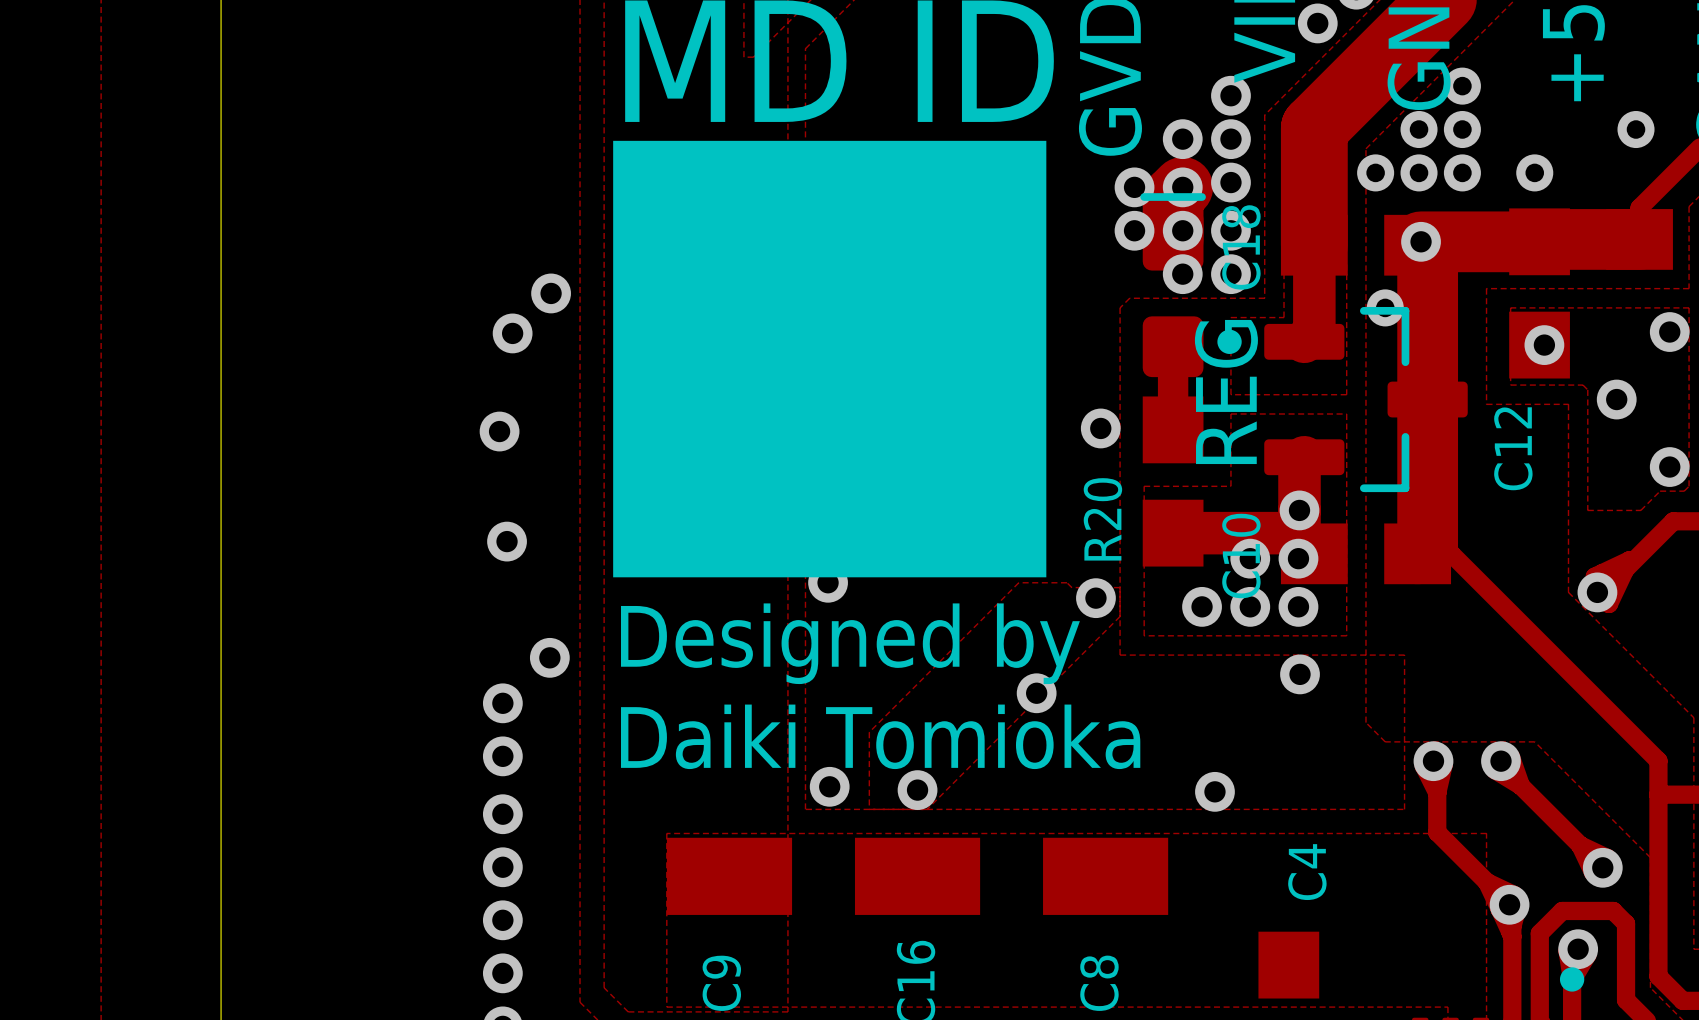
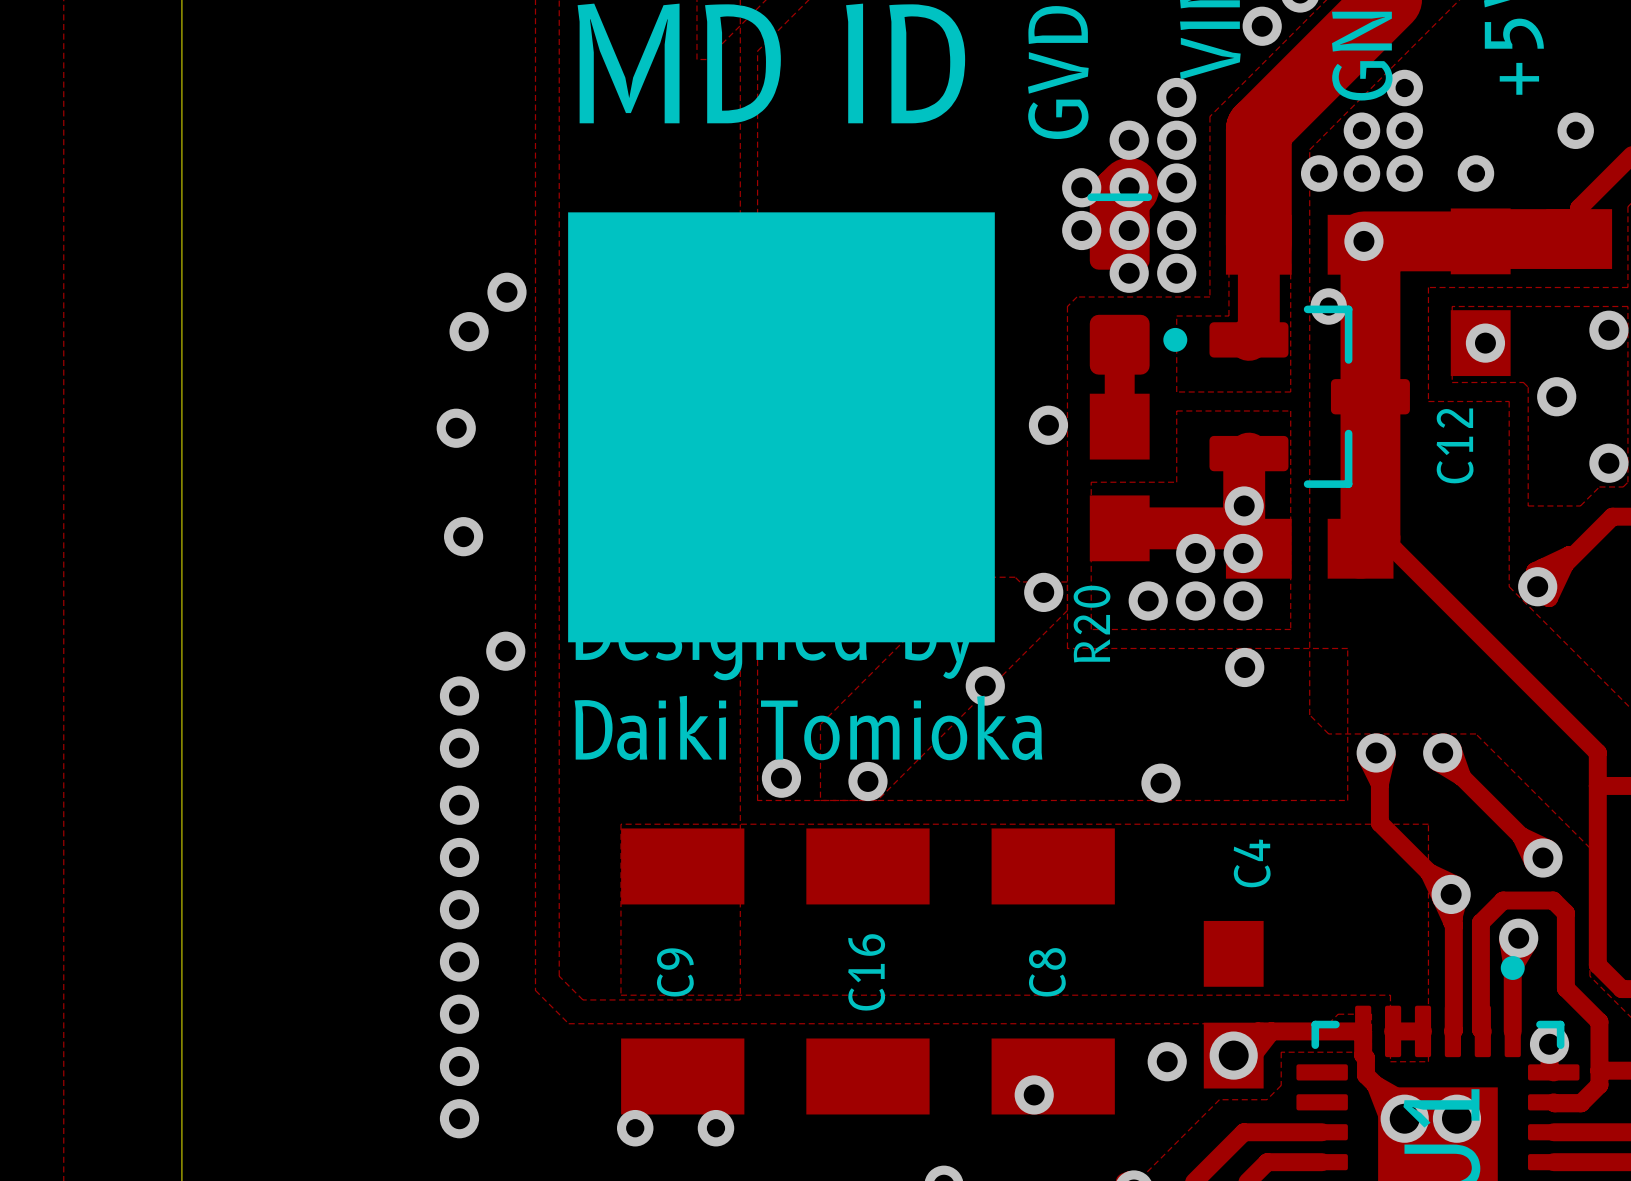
C18 name: C18 (1241, 247) -> none
drawing position: (829, 359) -> (781, 427)
REG name: REG (1226, 392) -> none
R20 name position: R20 (1102, 519) -> R20 (1092, 624)
C10 name: C10 (1241, 556) -> none

